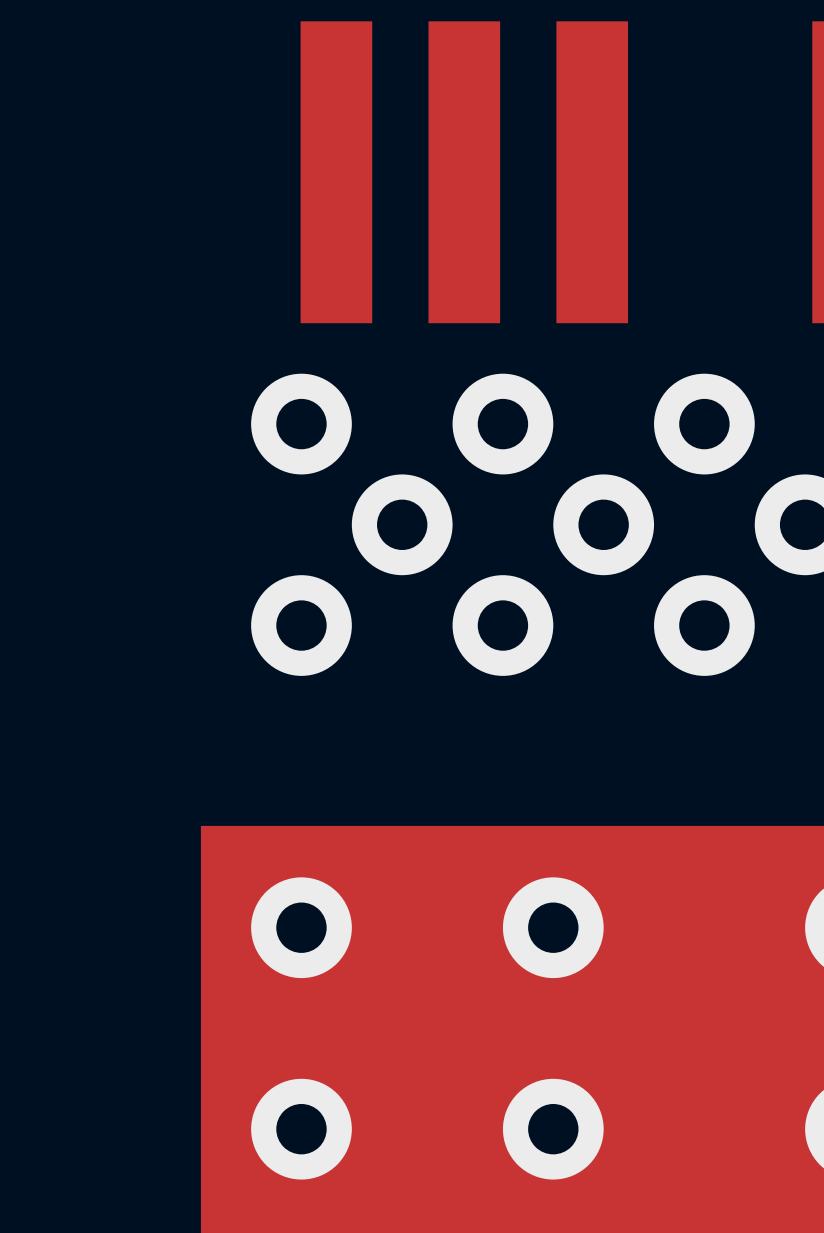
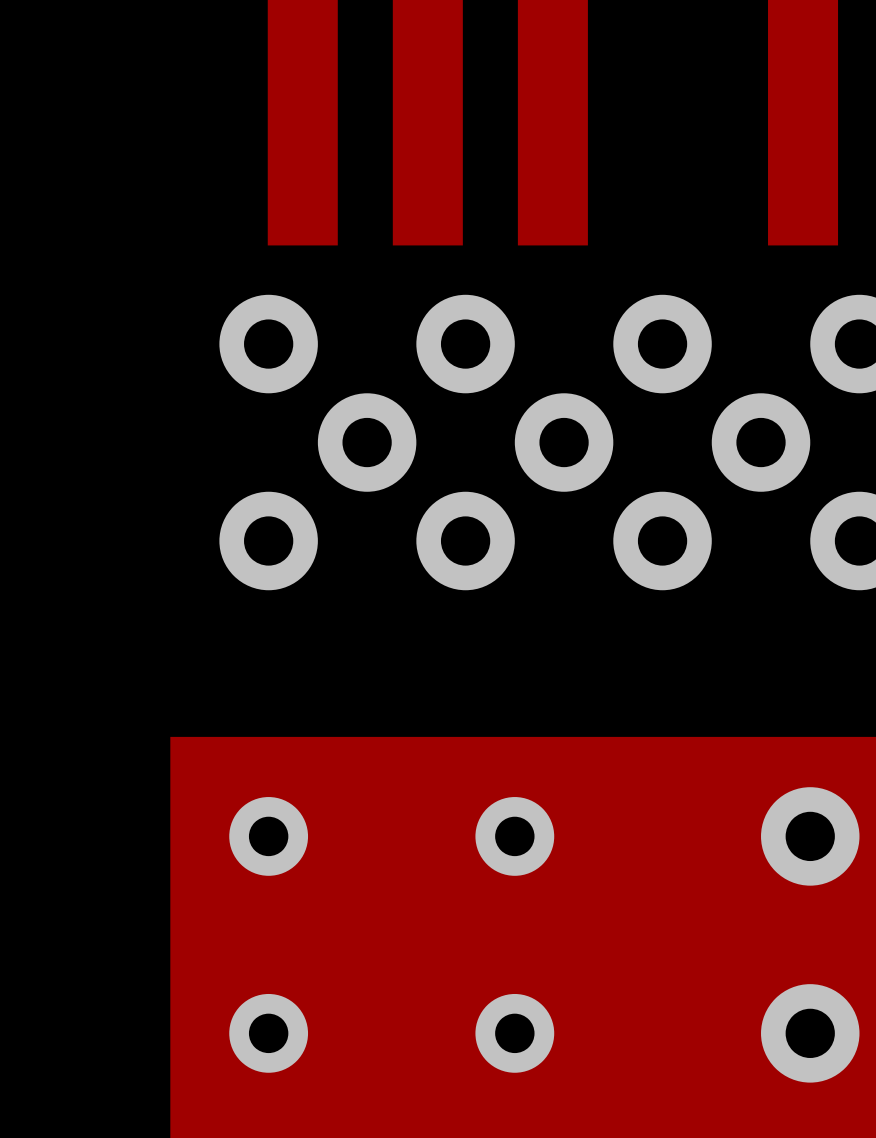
via size: [251, 877, 352, 979] -> [229, 797, 309, 876]
via size: [502, 877, 604, 979] -> [475, 797, 555, 876]
via size: [251, 1078, 352, 1180] -> [229, 993, 309, 1073]
via size: [502, 1078, 604, 1180] -> [475, 993, 555, 1073]

